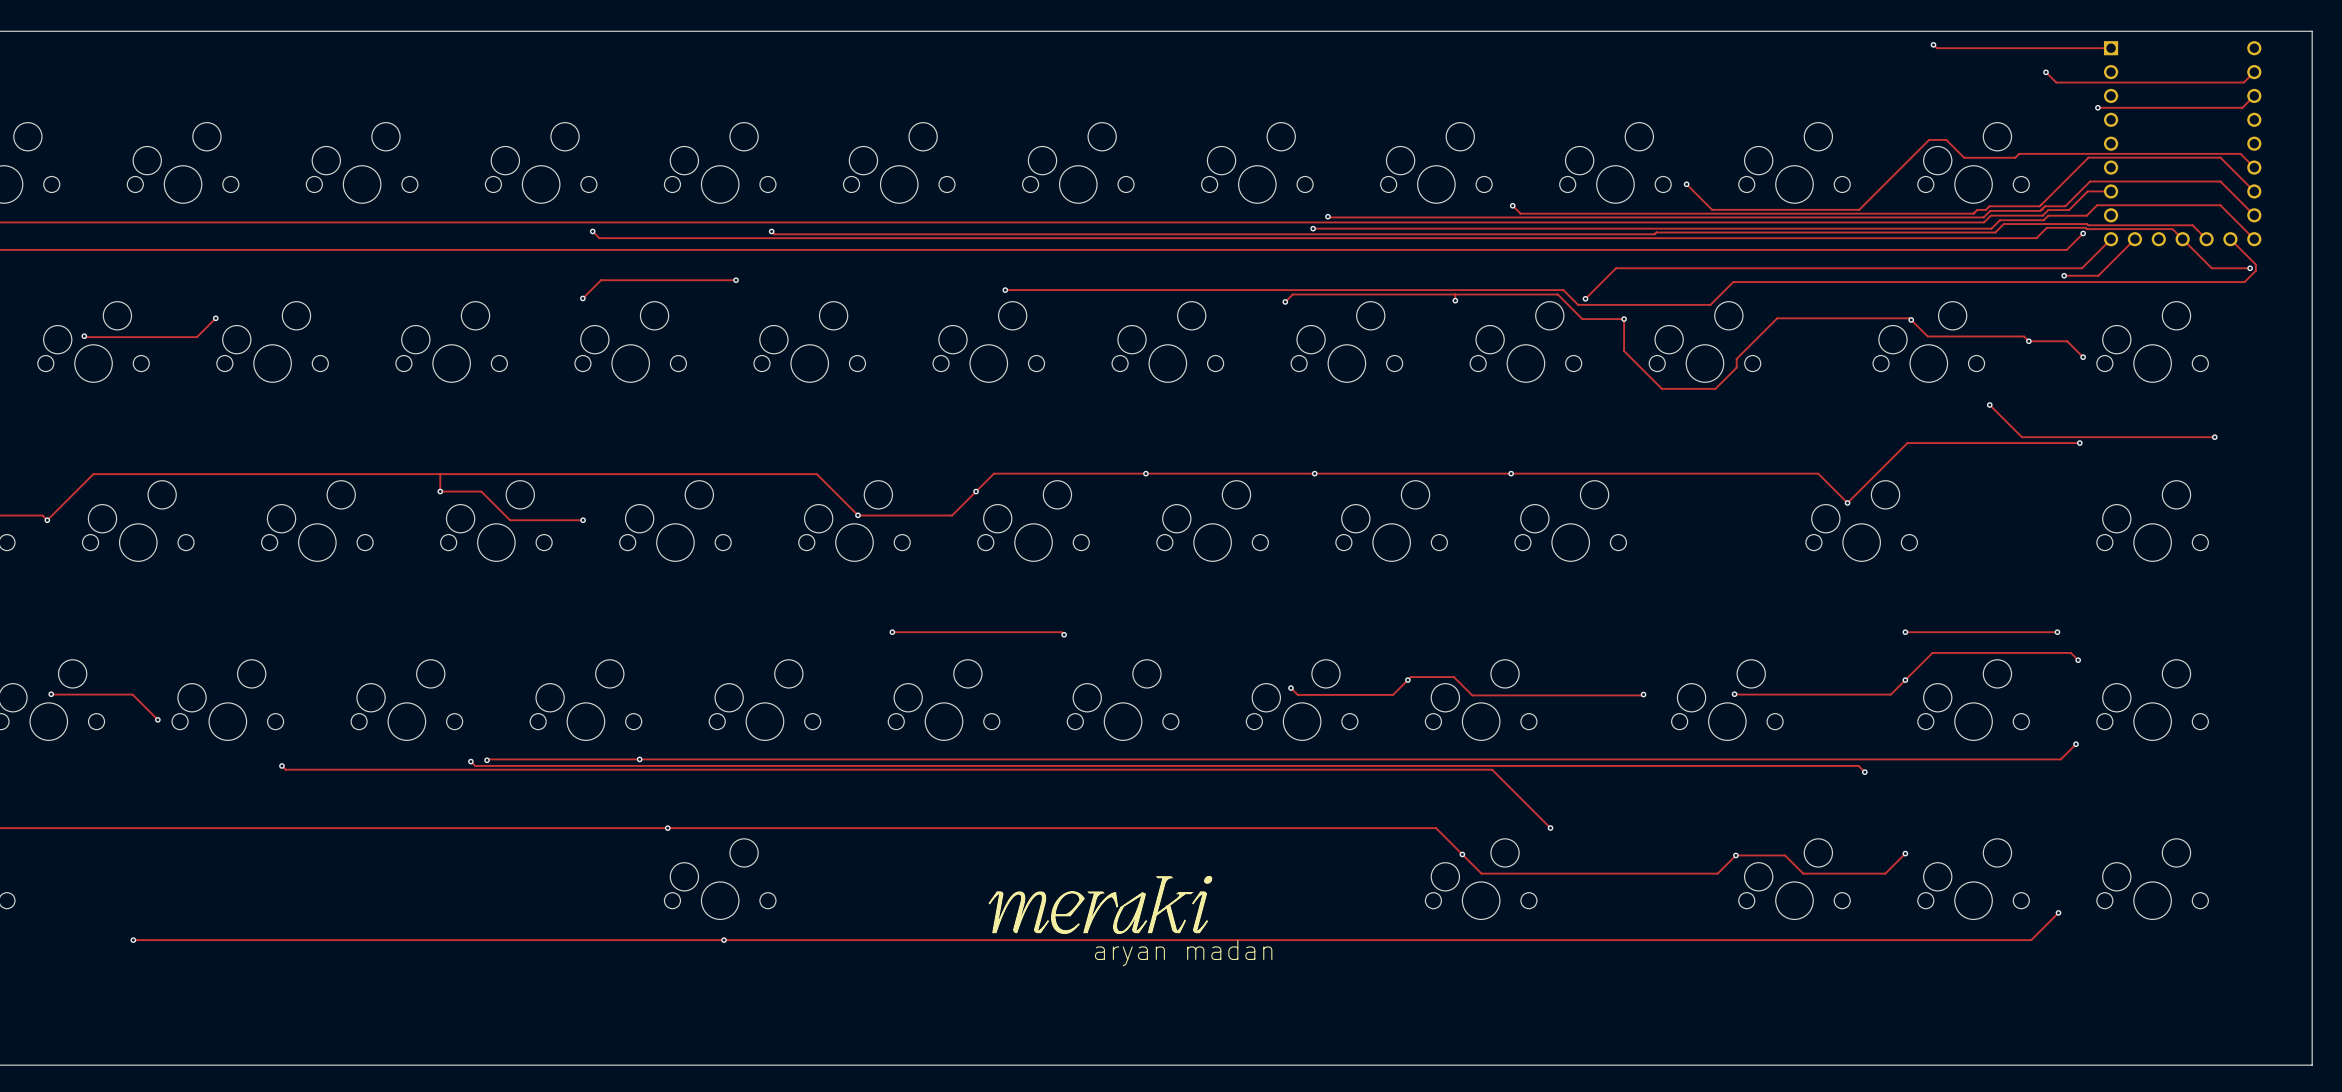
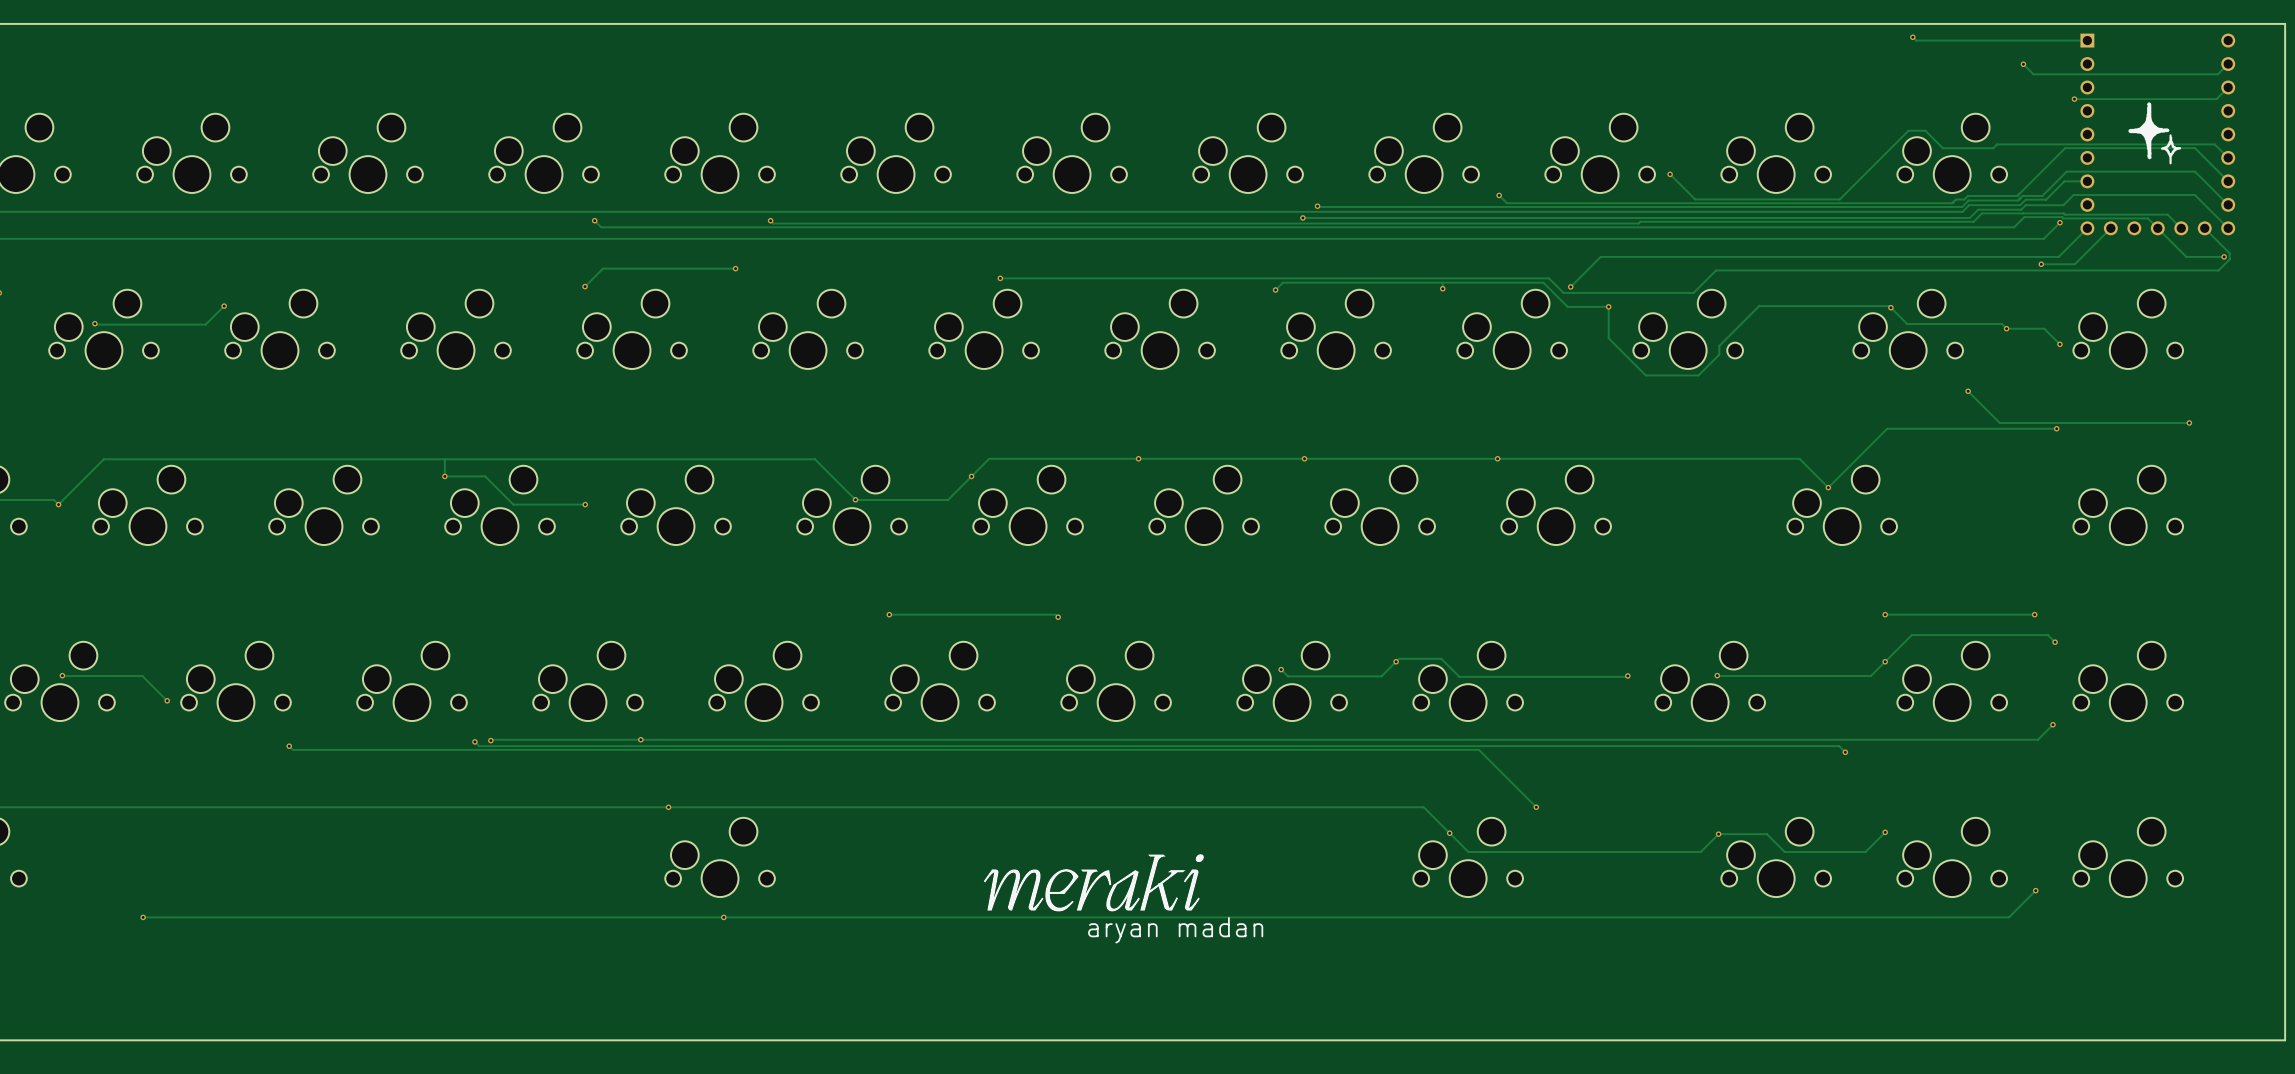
drawing: none -> [2128, 102, 2182, 165]

